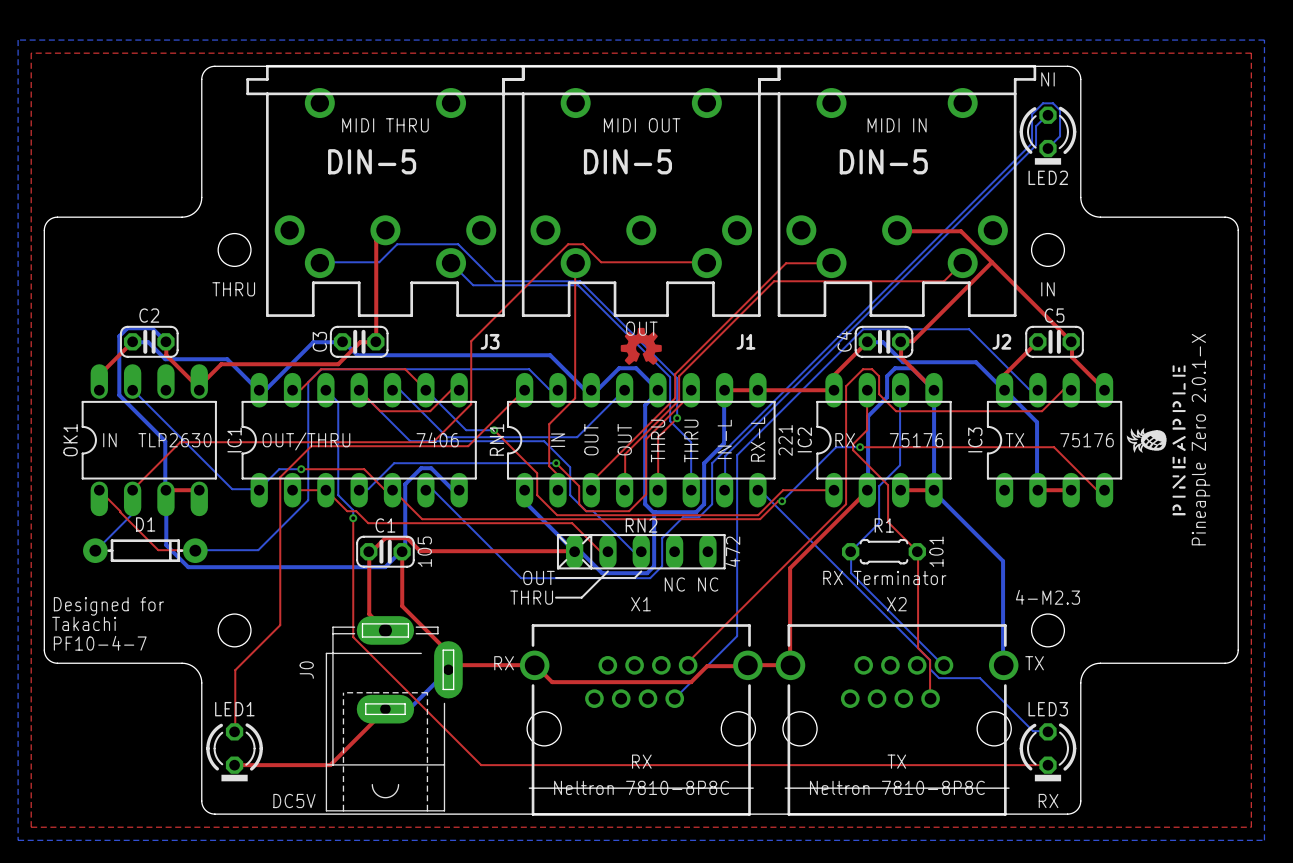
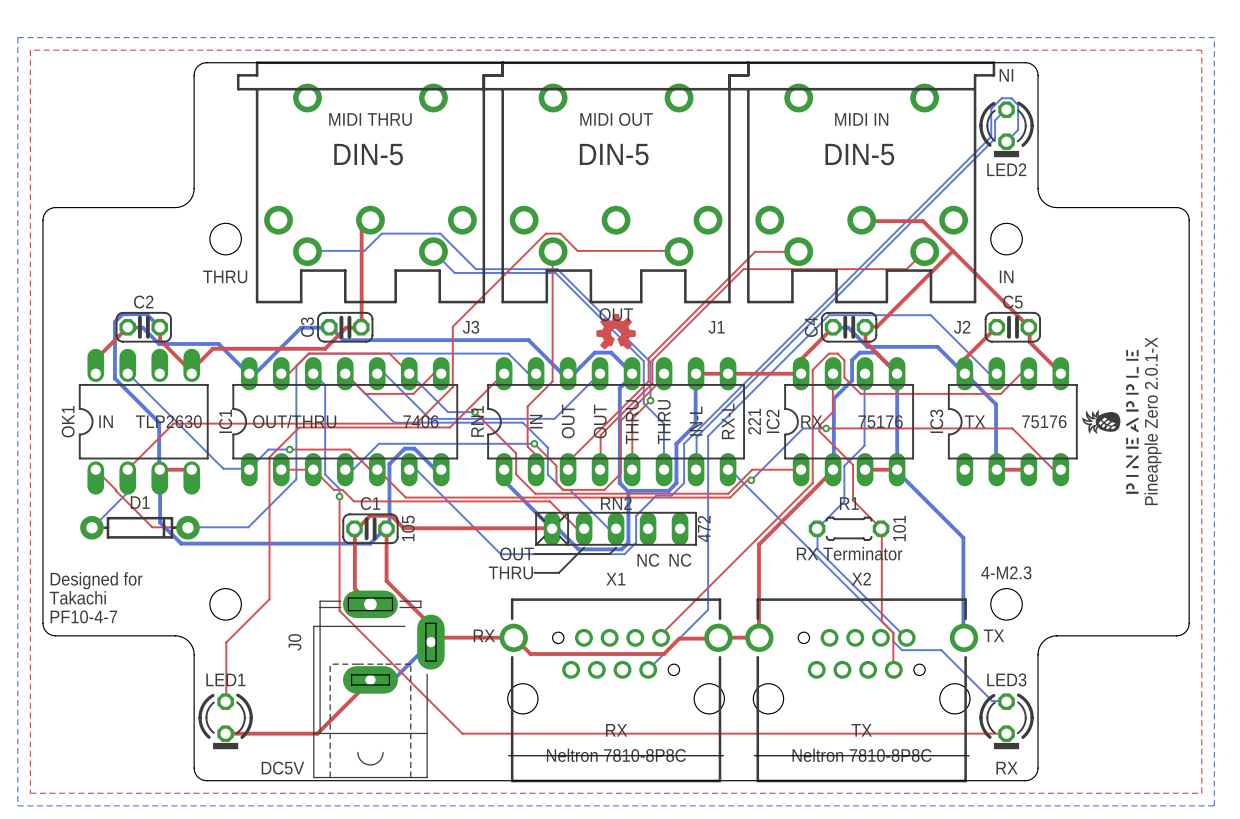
X1 footprint: [519, 624, 763, 816] -> [499, 598, 733, 783]
X2 footprint: [775, 624, 1019, 816] -> [745, 598, 979, 783]

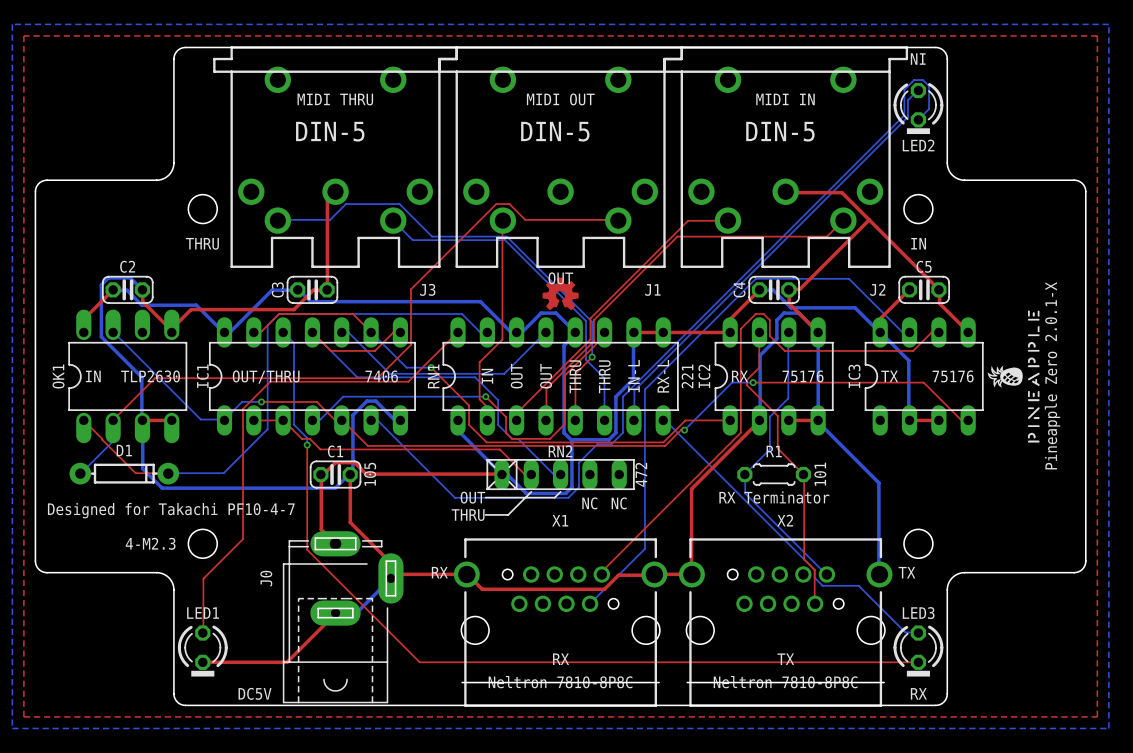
text: none -> Designed for Takachi PF10-4-7 (171, 510)
text: 4-M2.3 (1006, 572) -> none
text: Designed for (96, 580) -> none
text: Takachi (77, 597) -> none
text: none -> 4-M2.3 (150, 543)
text: PF10-4-7 (83, 616) -> none

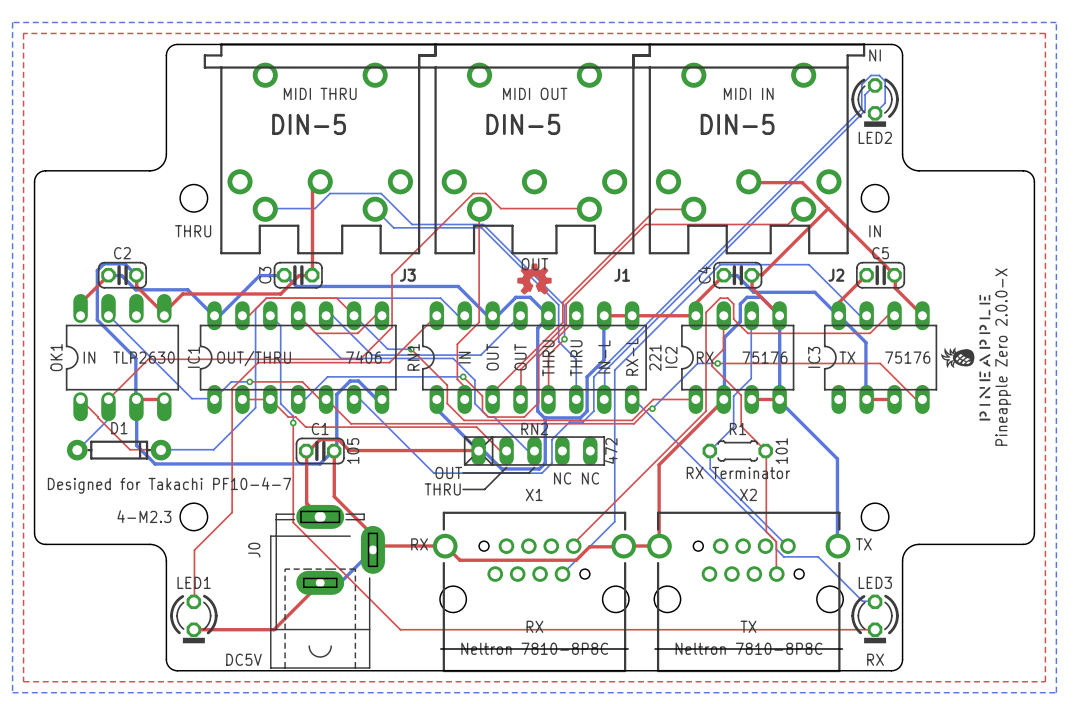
text: Pineapple Zero 2.0.1-X (1052, 375) -> Pineapple Zero 2.0.0-X (1003, 357)

